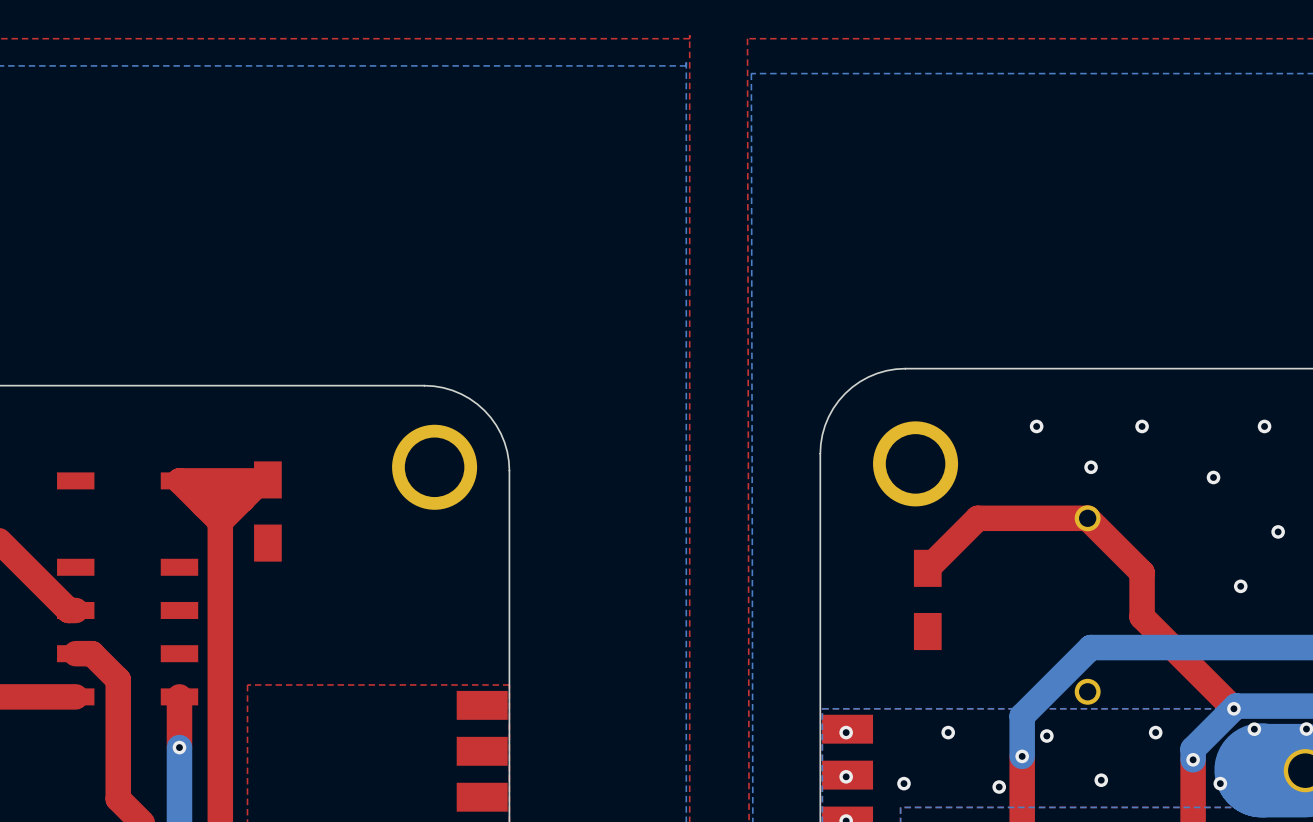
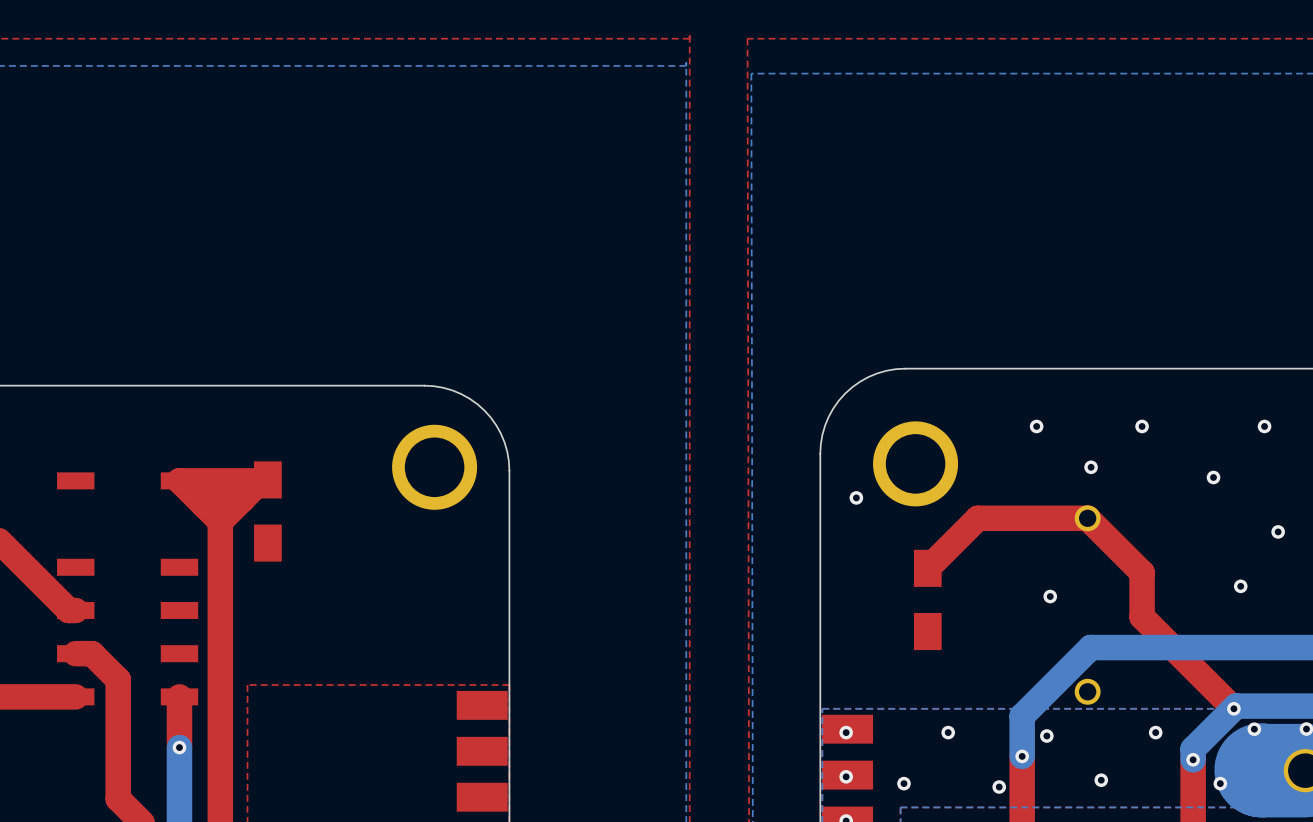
via: none -> (856, 497)
via: none -> (1050, 596)

